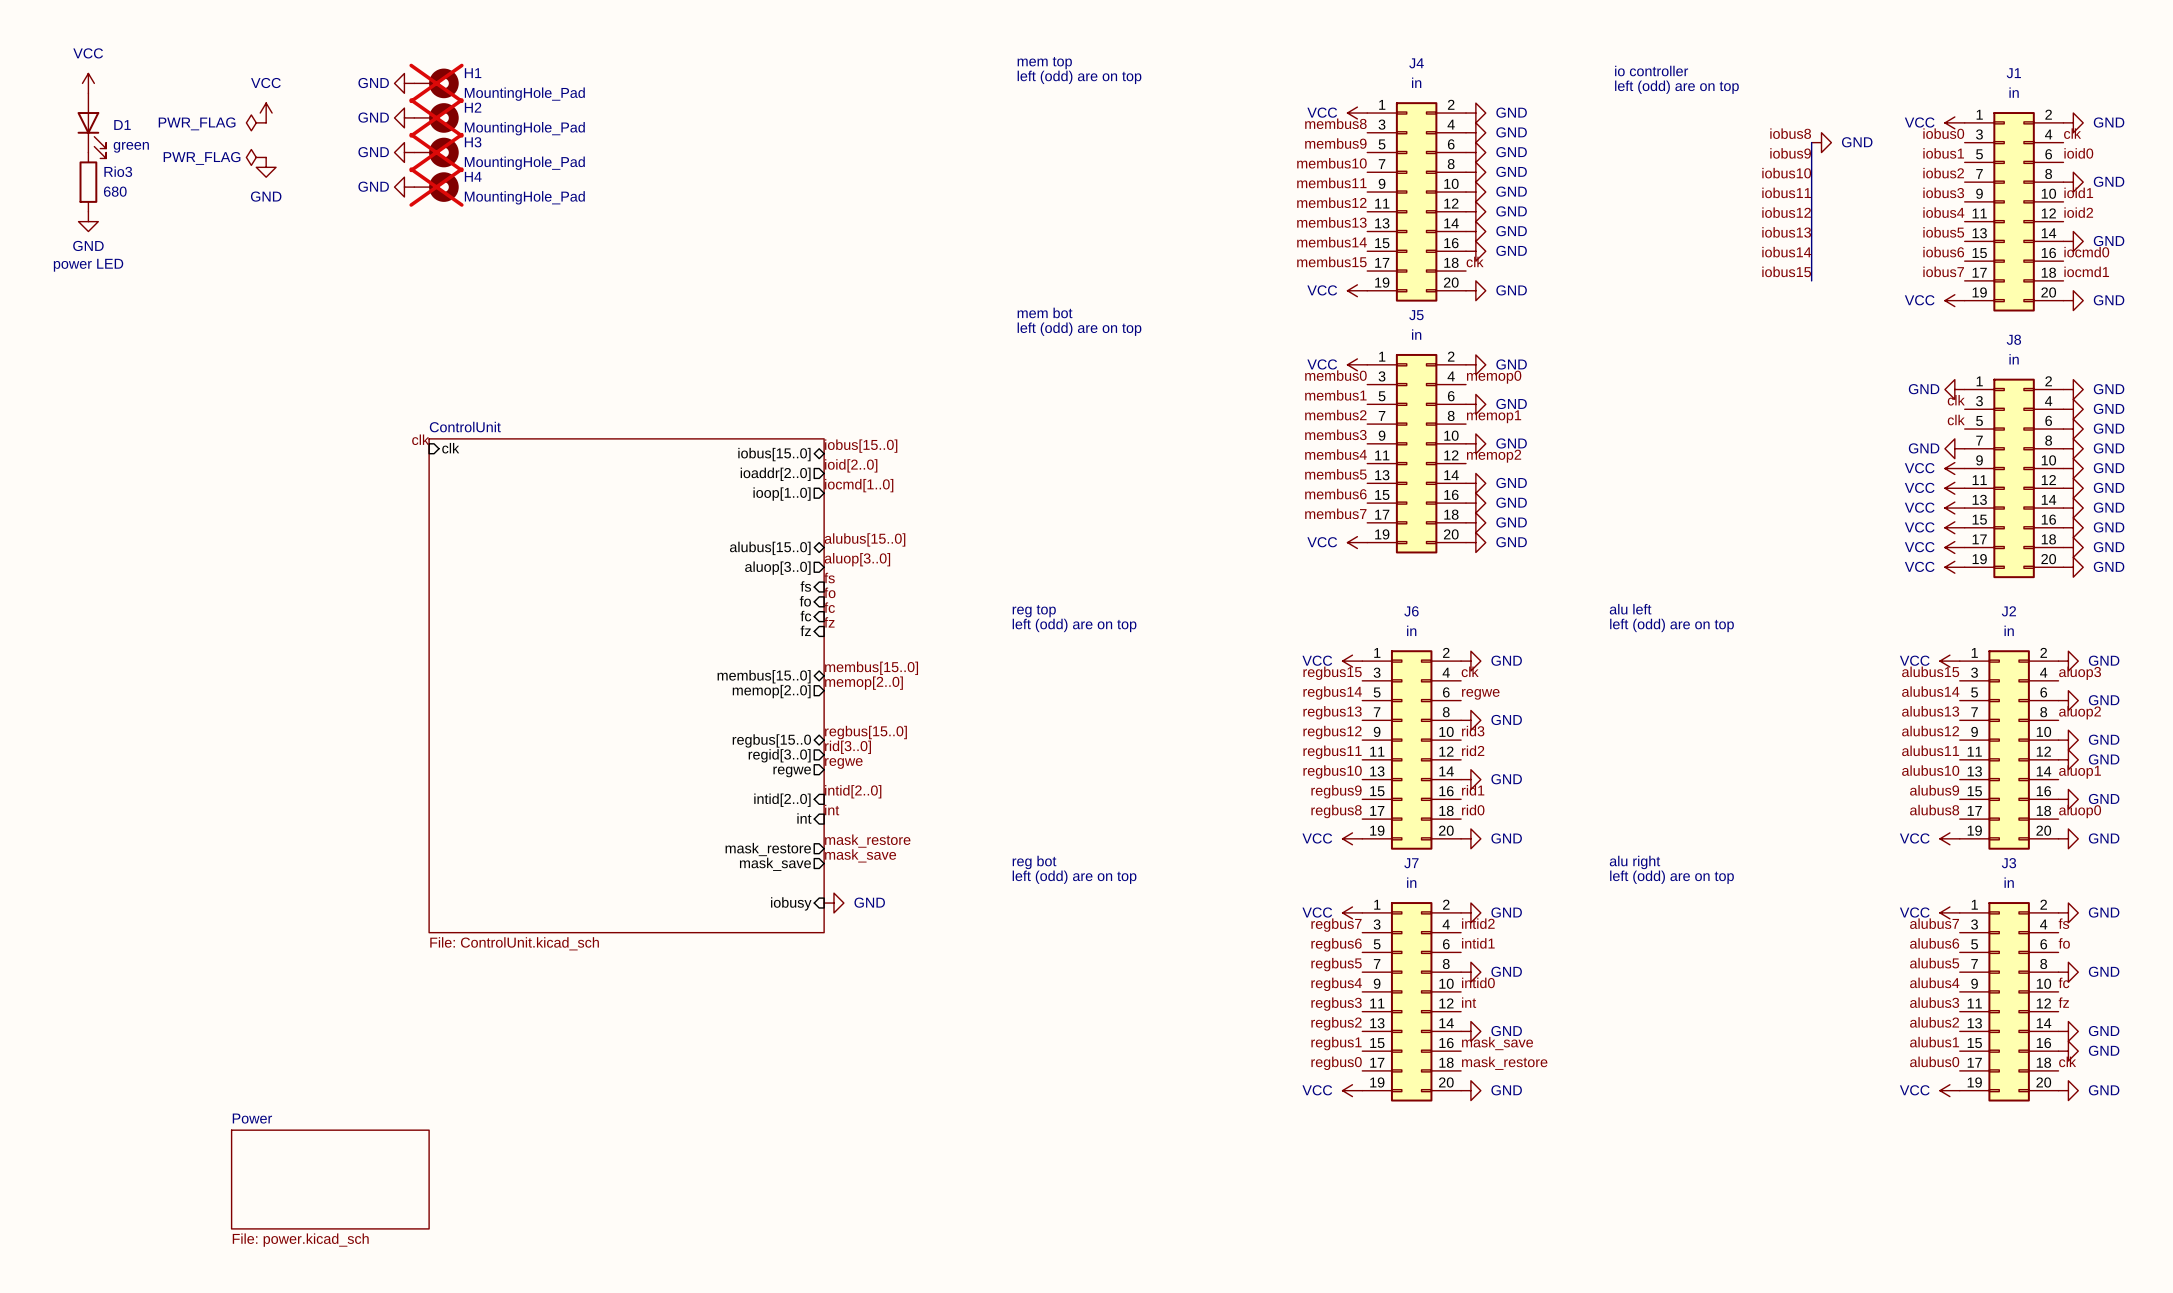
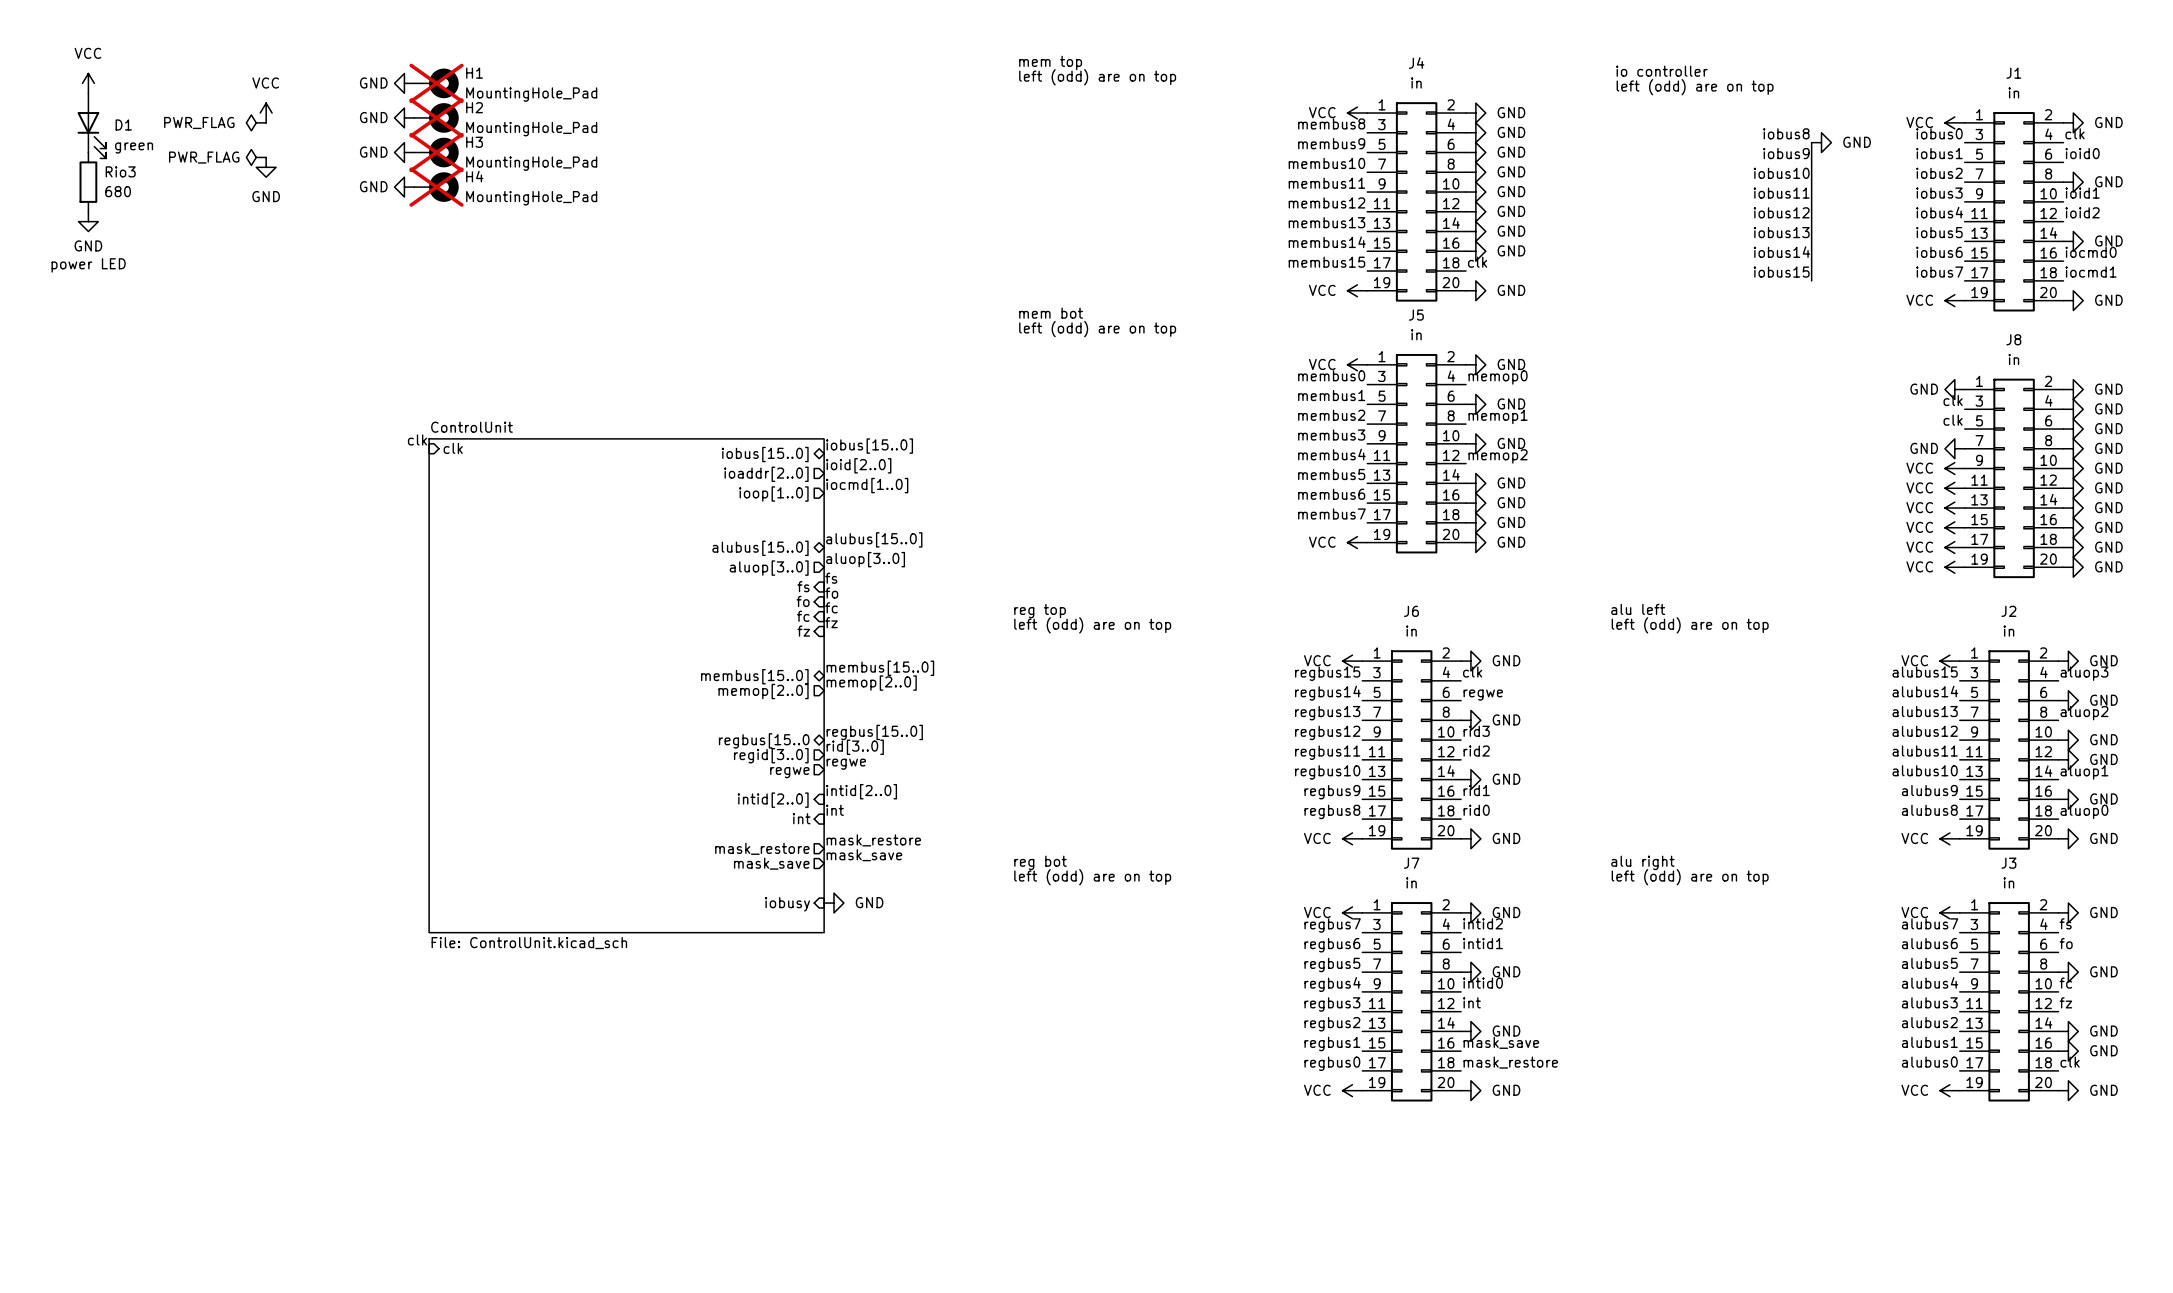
sheet Power: File: power.kicad_sch (330, 1179) -> none

